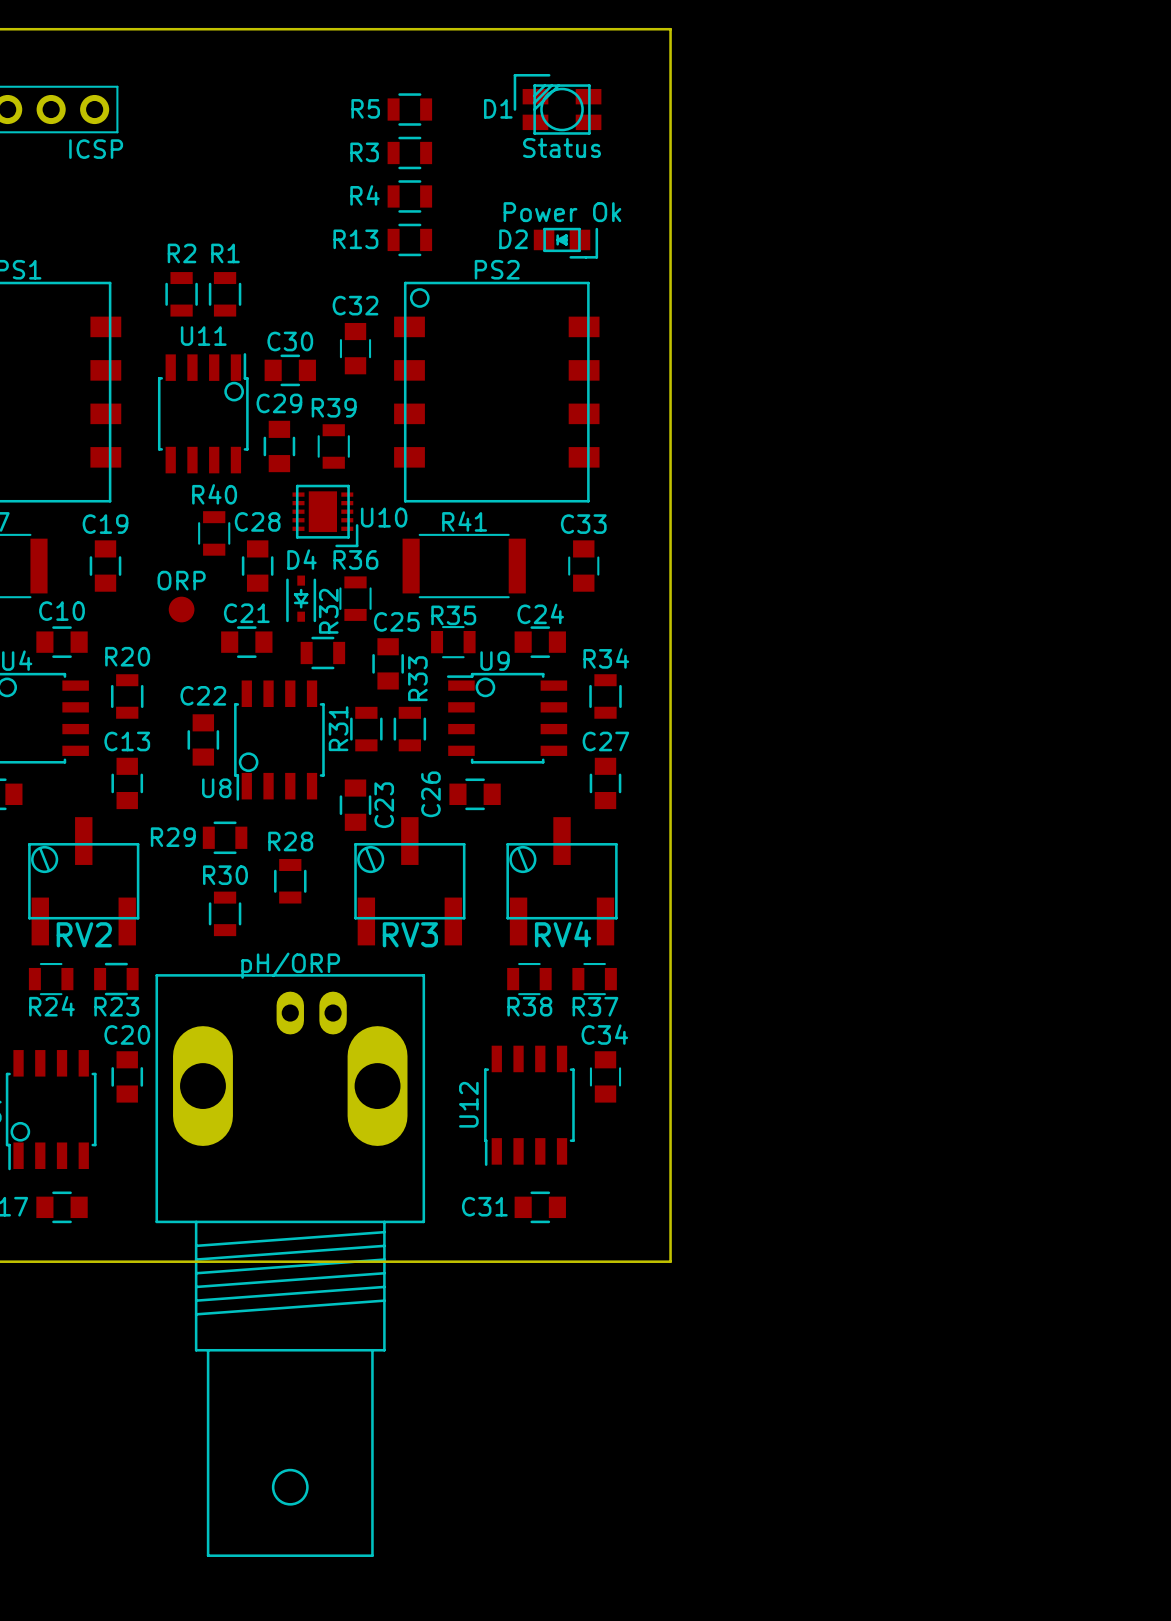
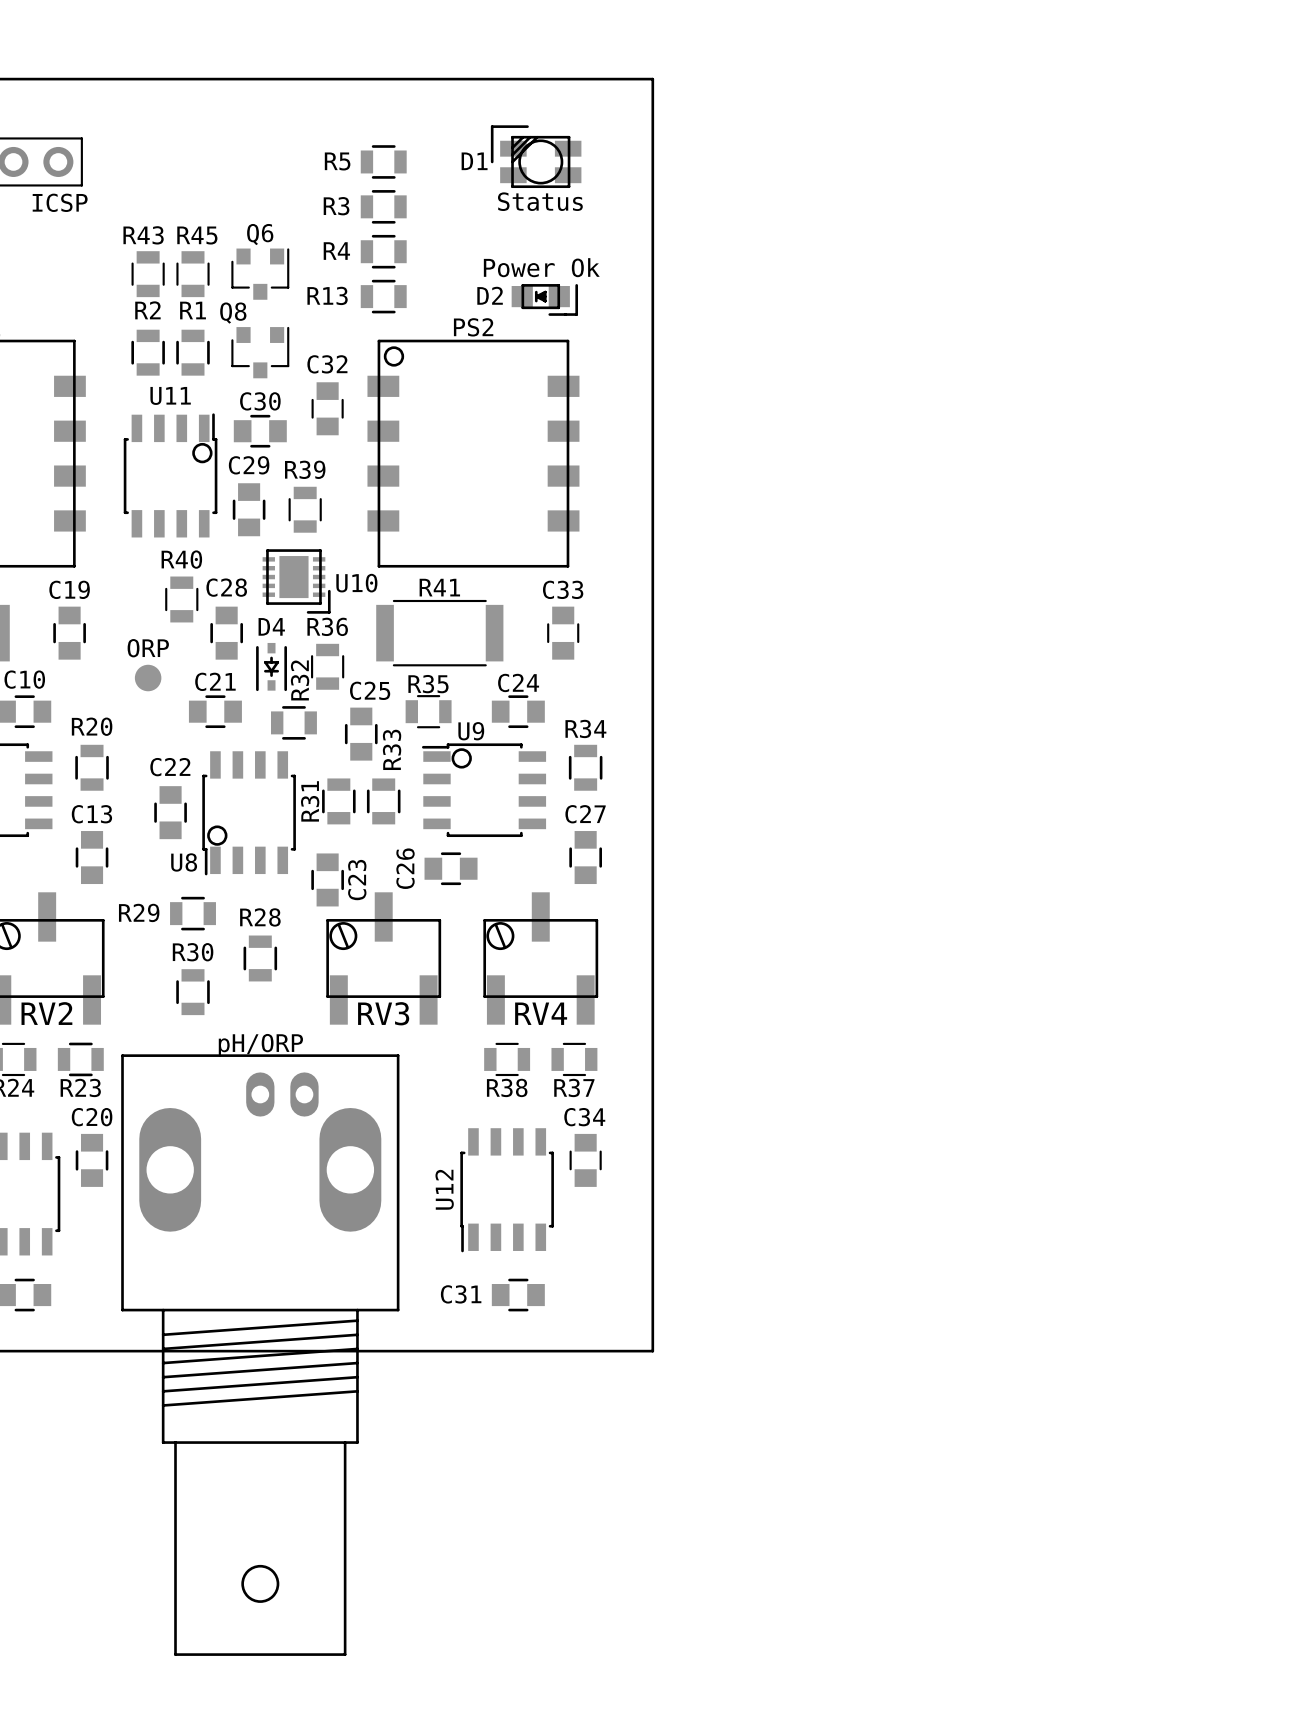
R43: none -> (148, 274)
R45: none -> (193, 274)
Q6: none -> (260, 274)
Q8: none -> (260, 352)

